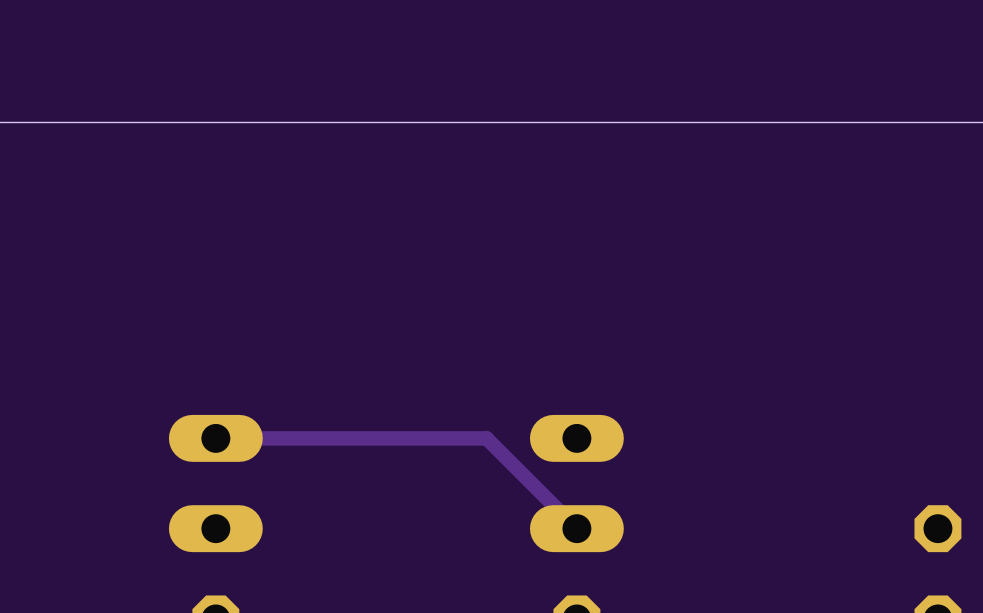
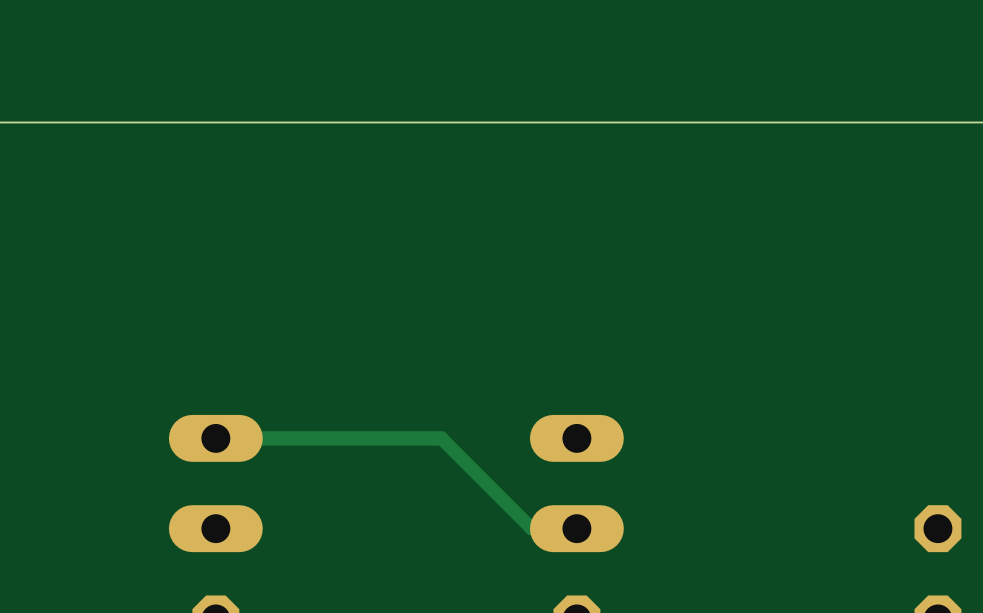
track: (441, 438) (486, 438) (576, 528) -> (441, 438) (531, 528) (576, 528)

